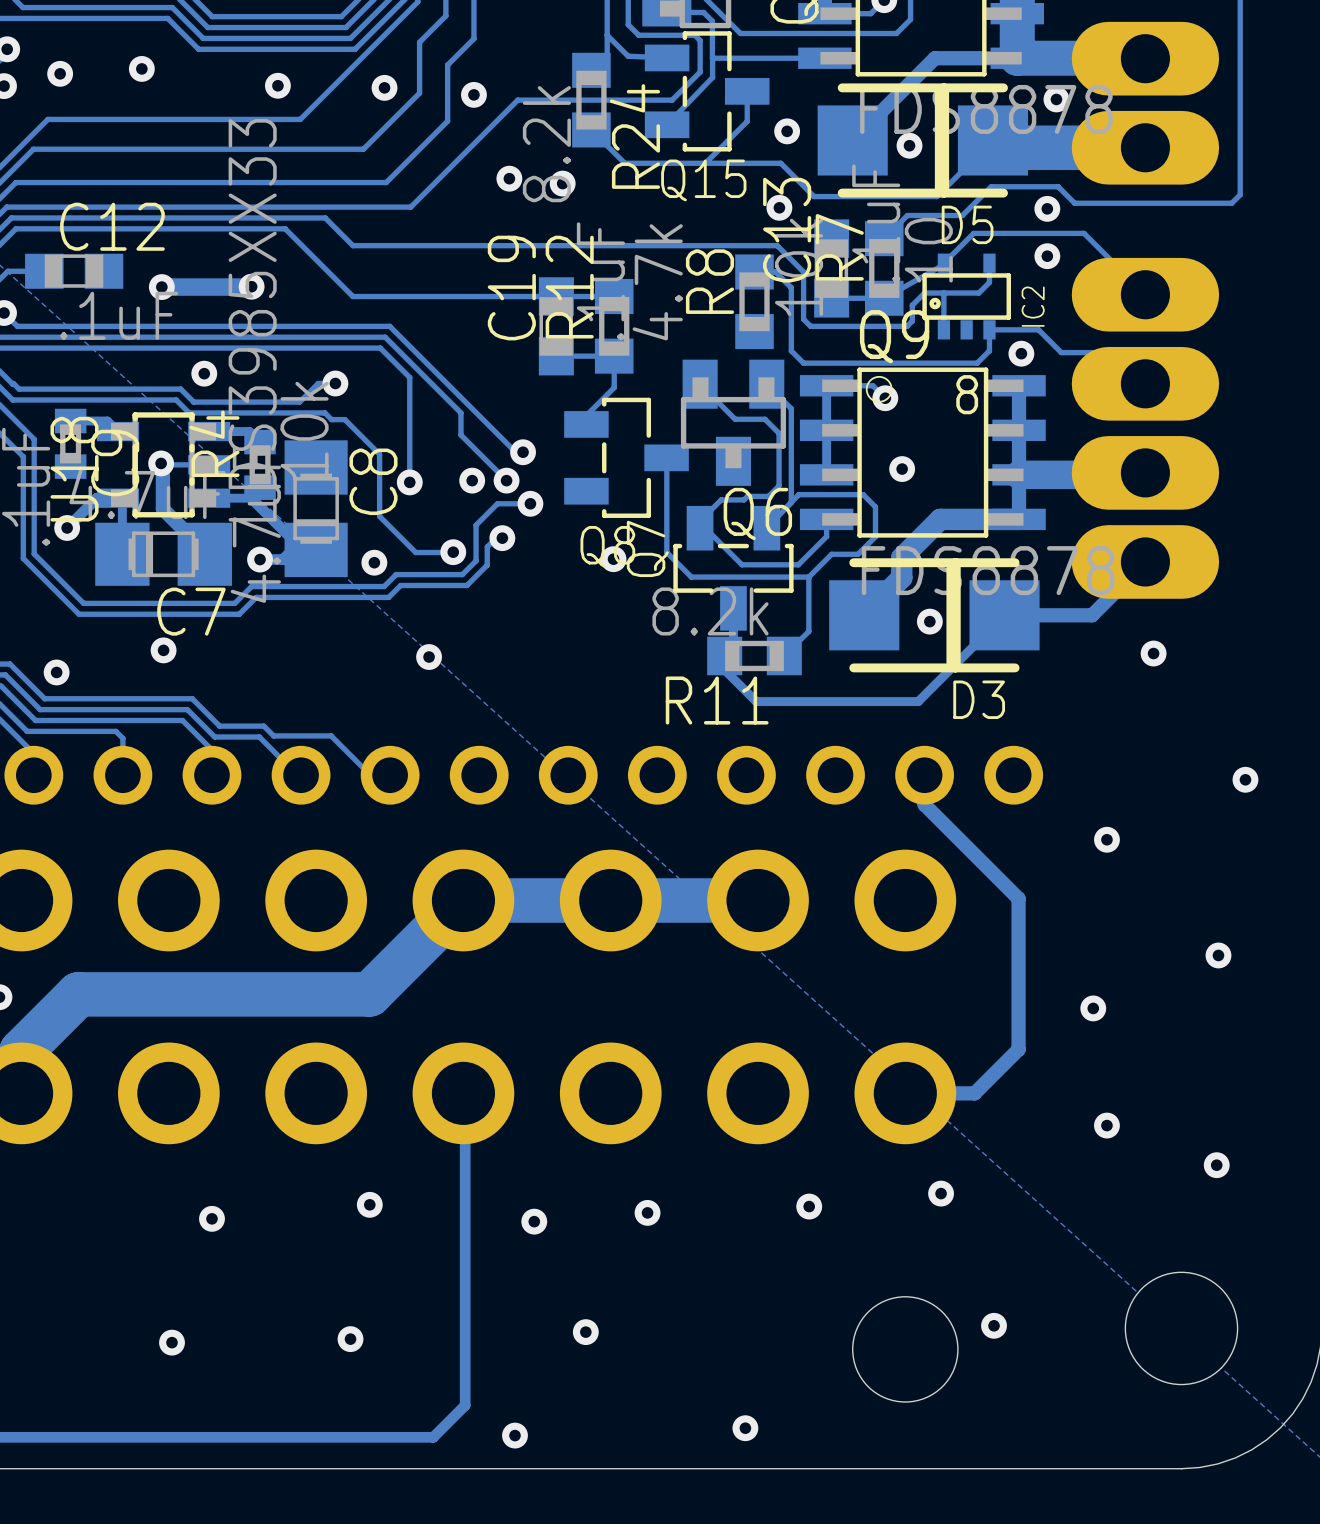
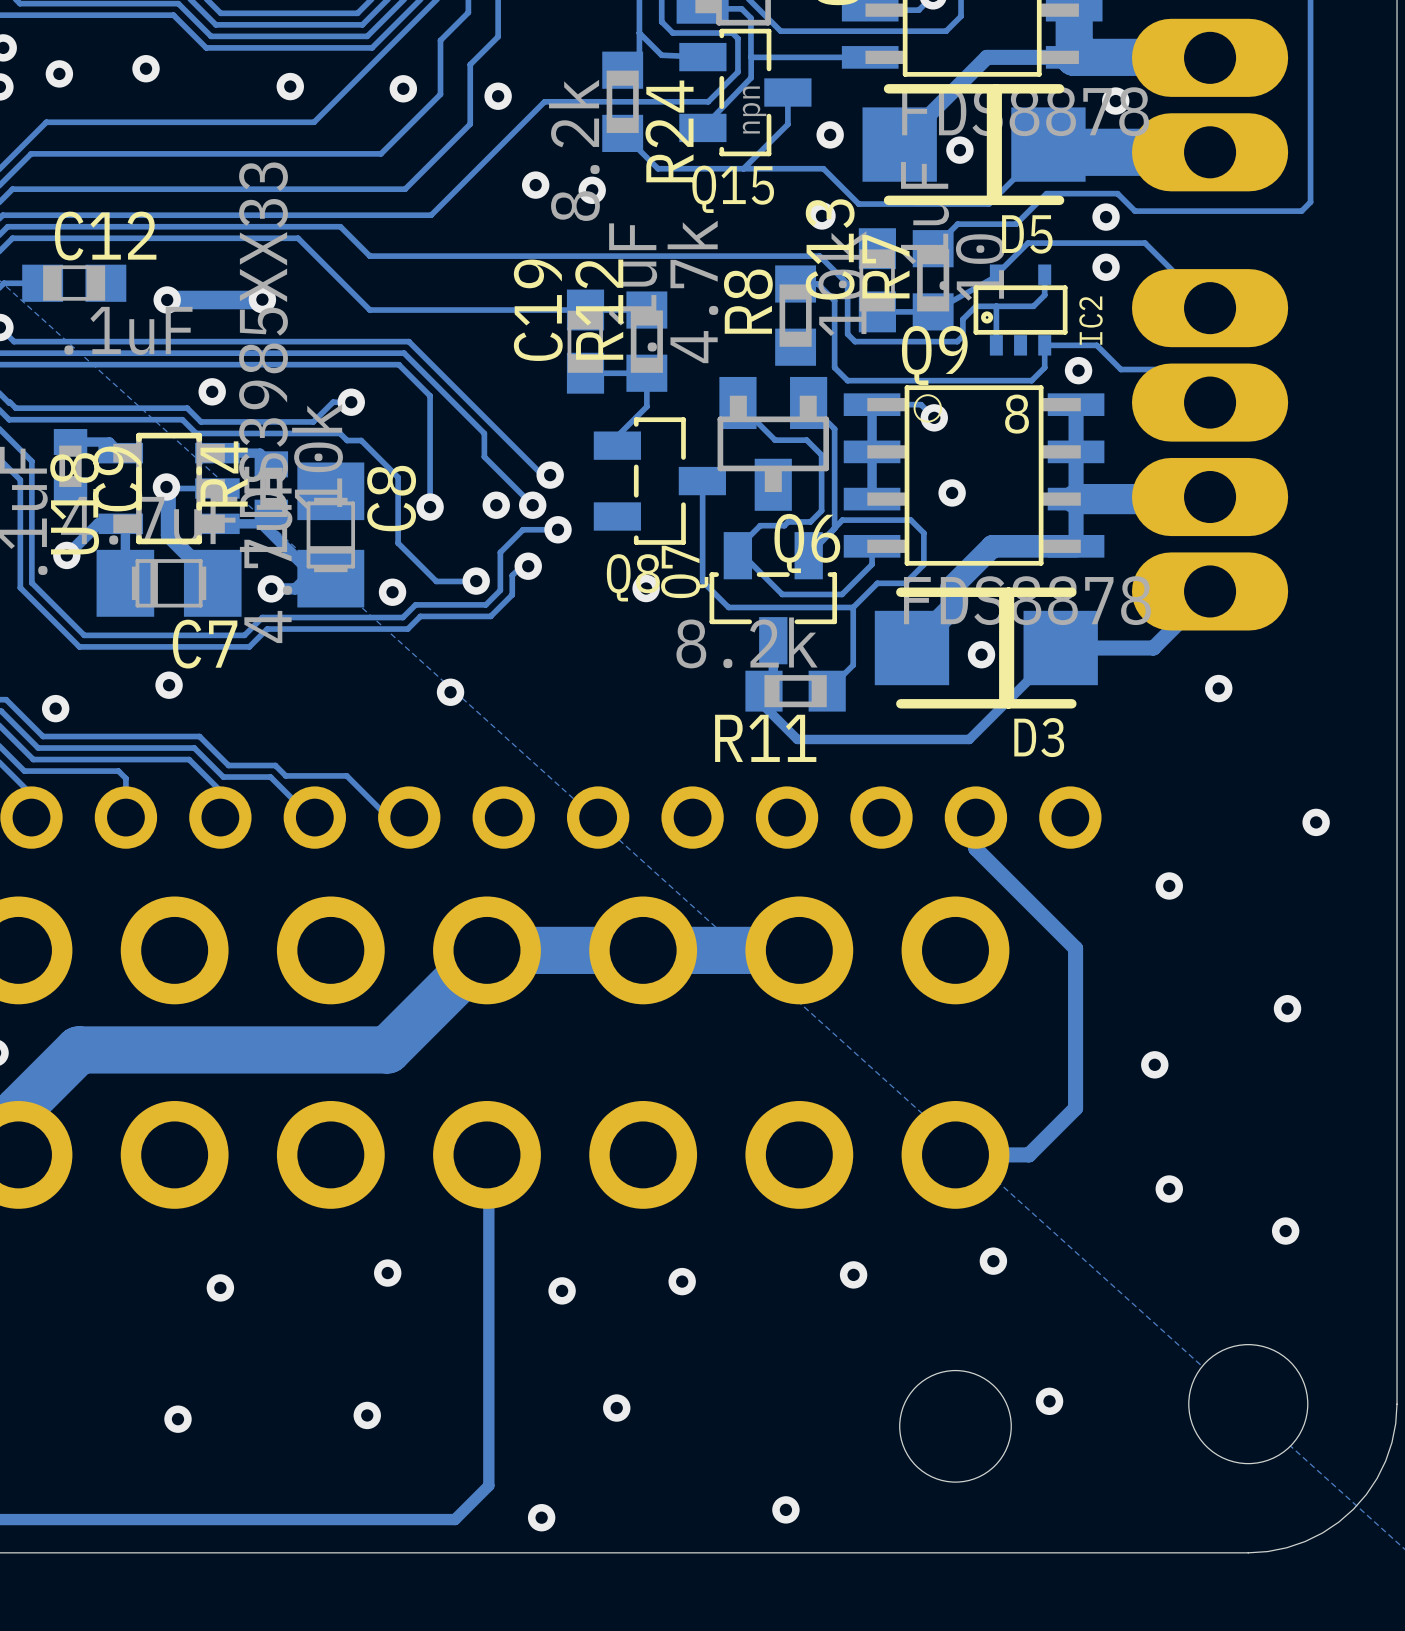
text: none -> npn (754, 109)

